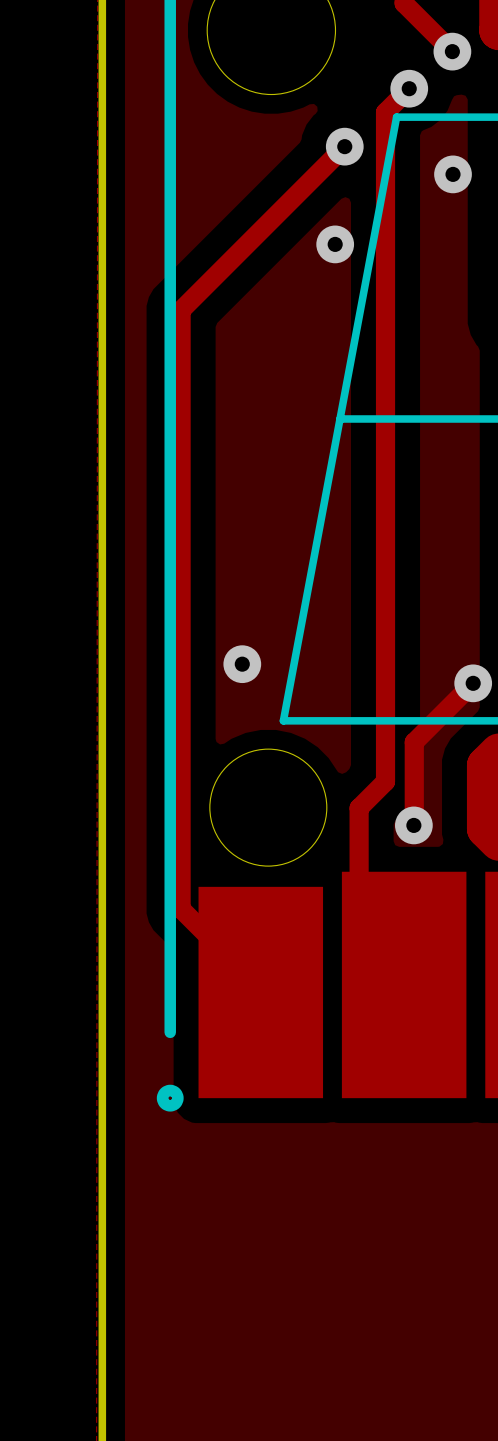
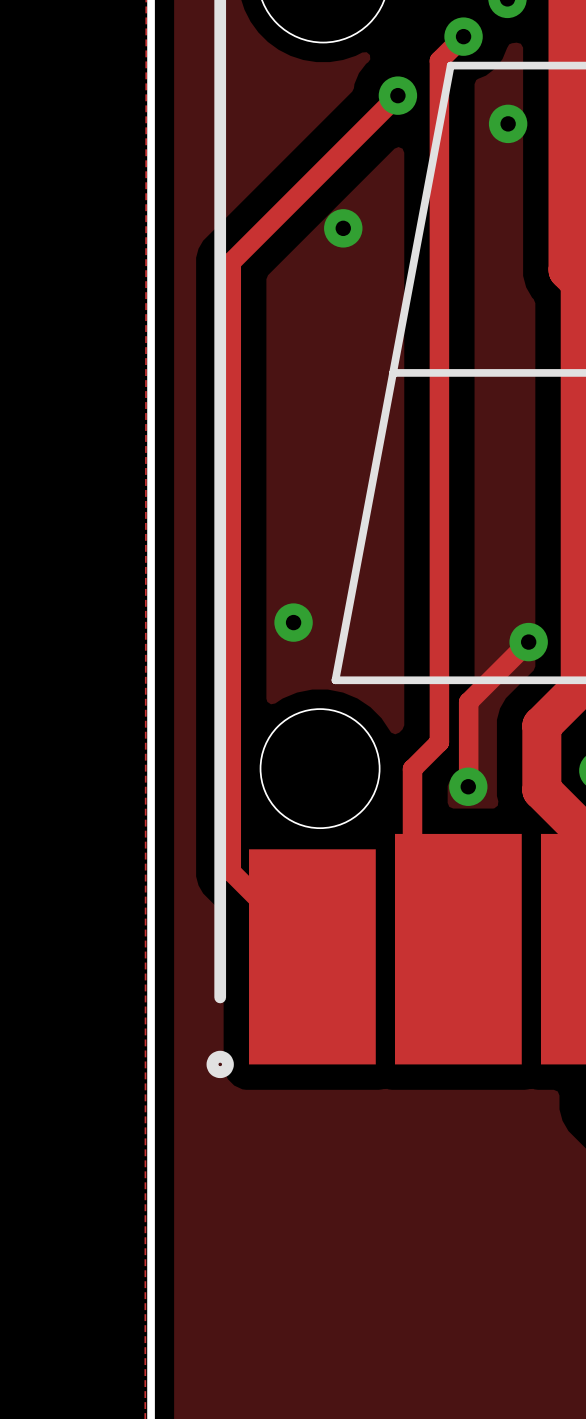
via position: (335, 244) -> (343, 228)

